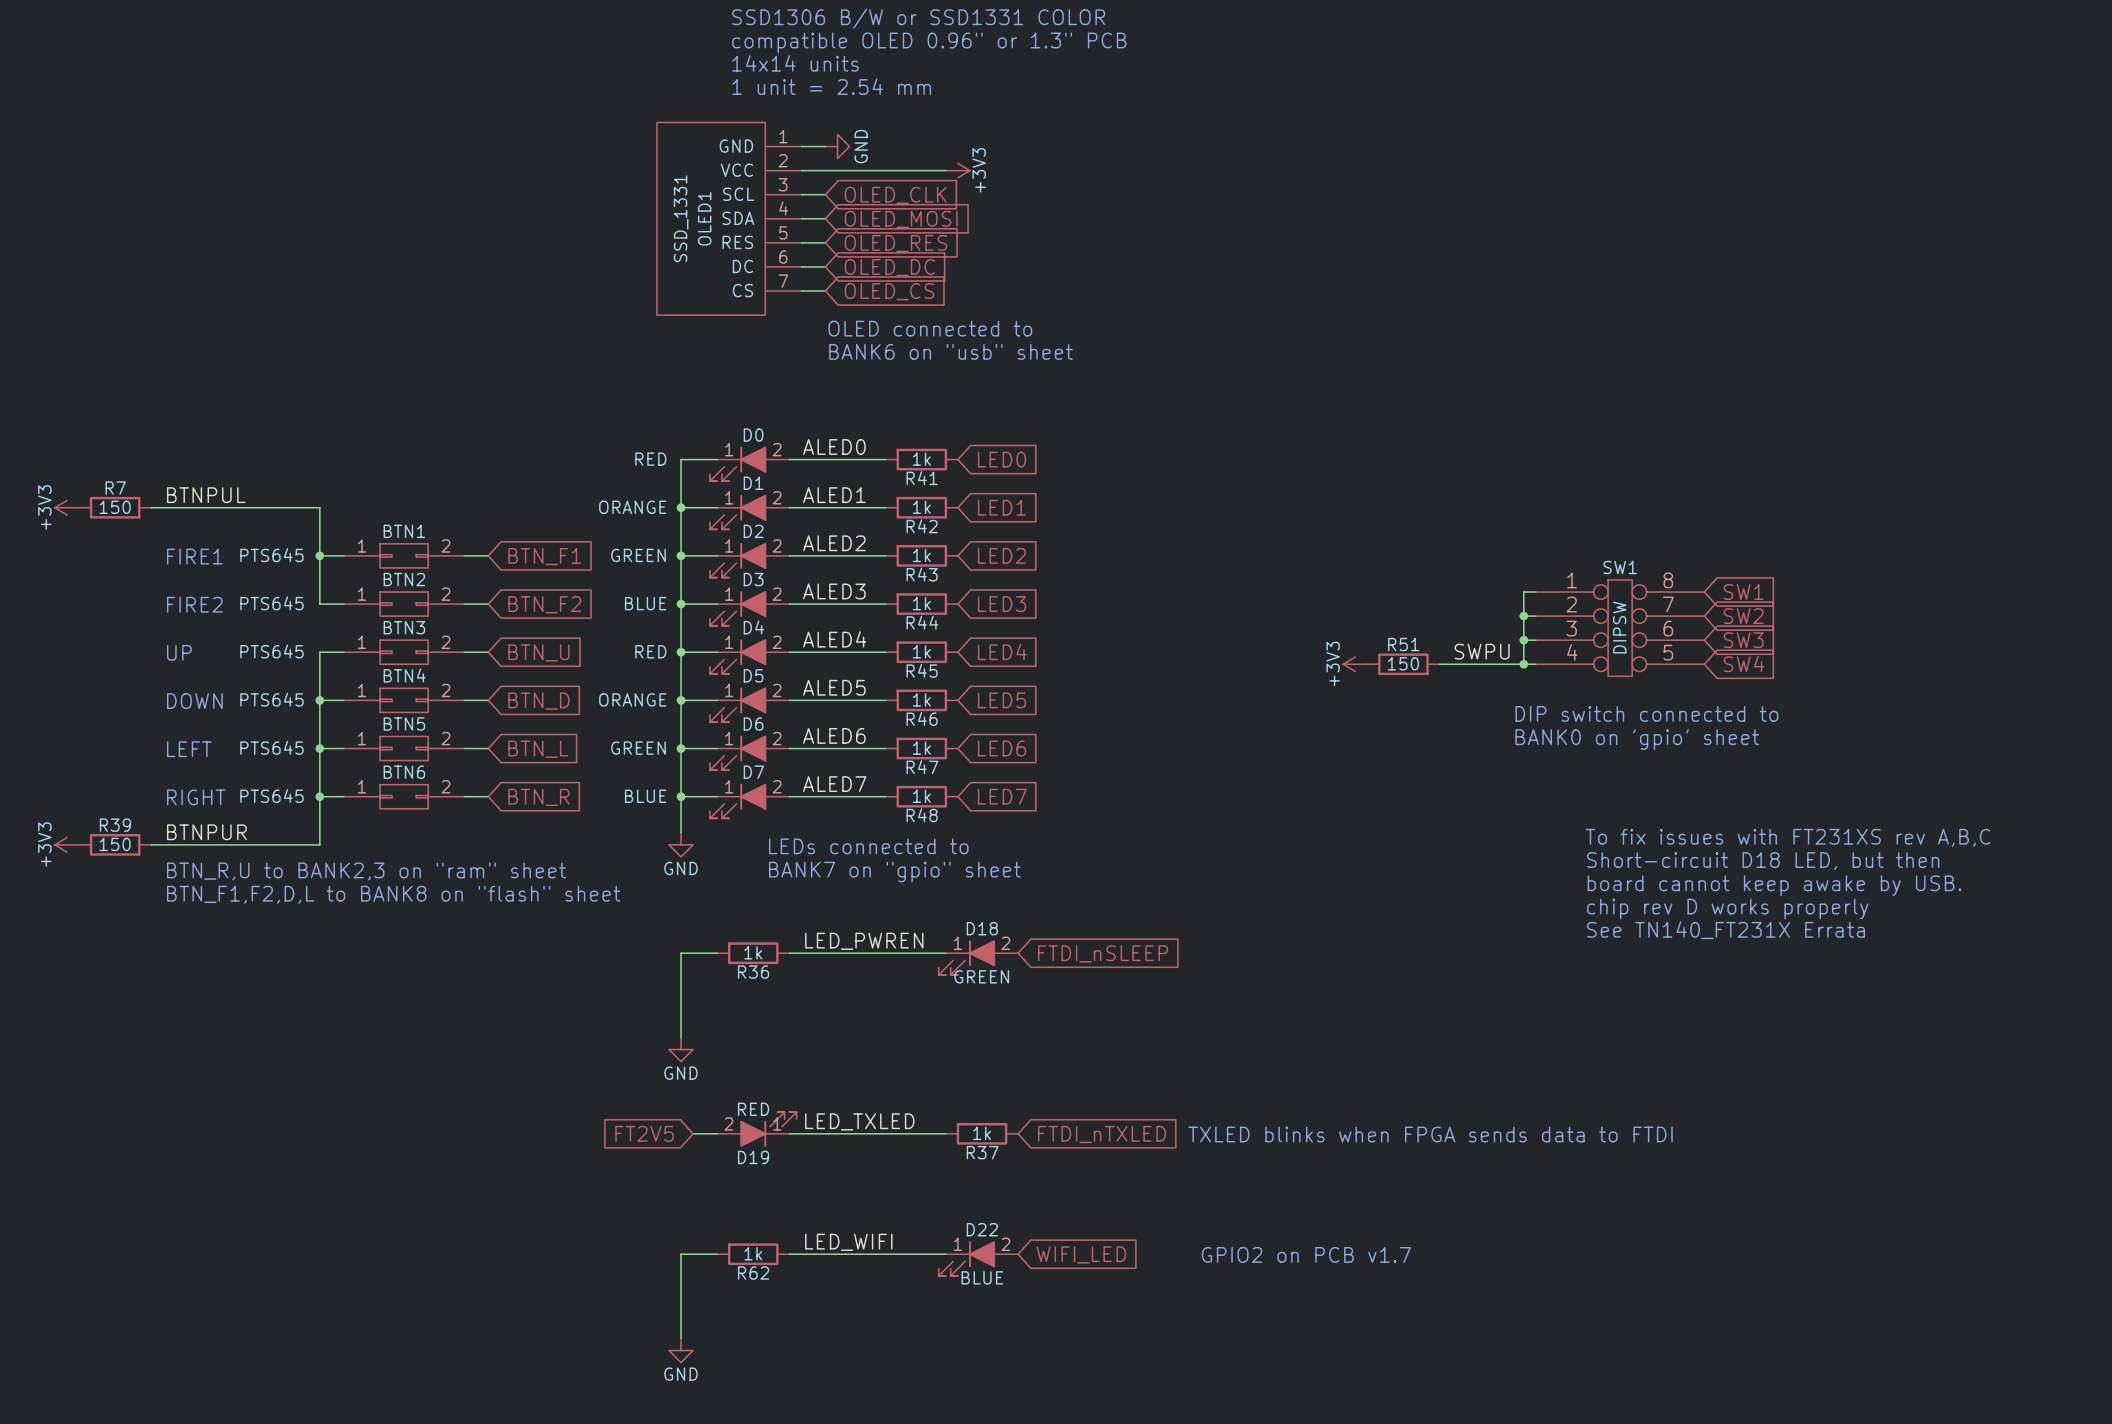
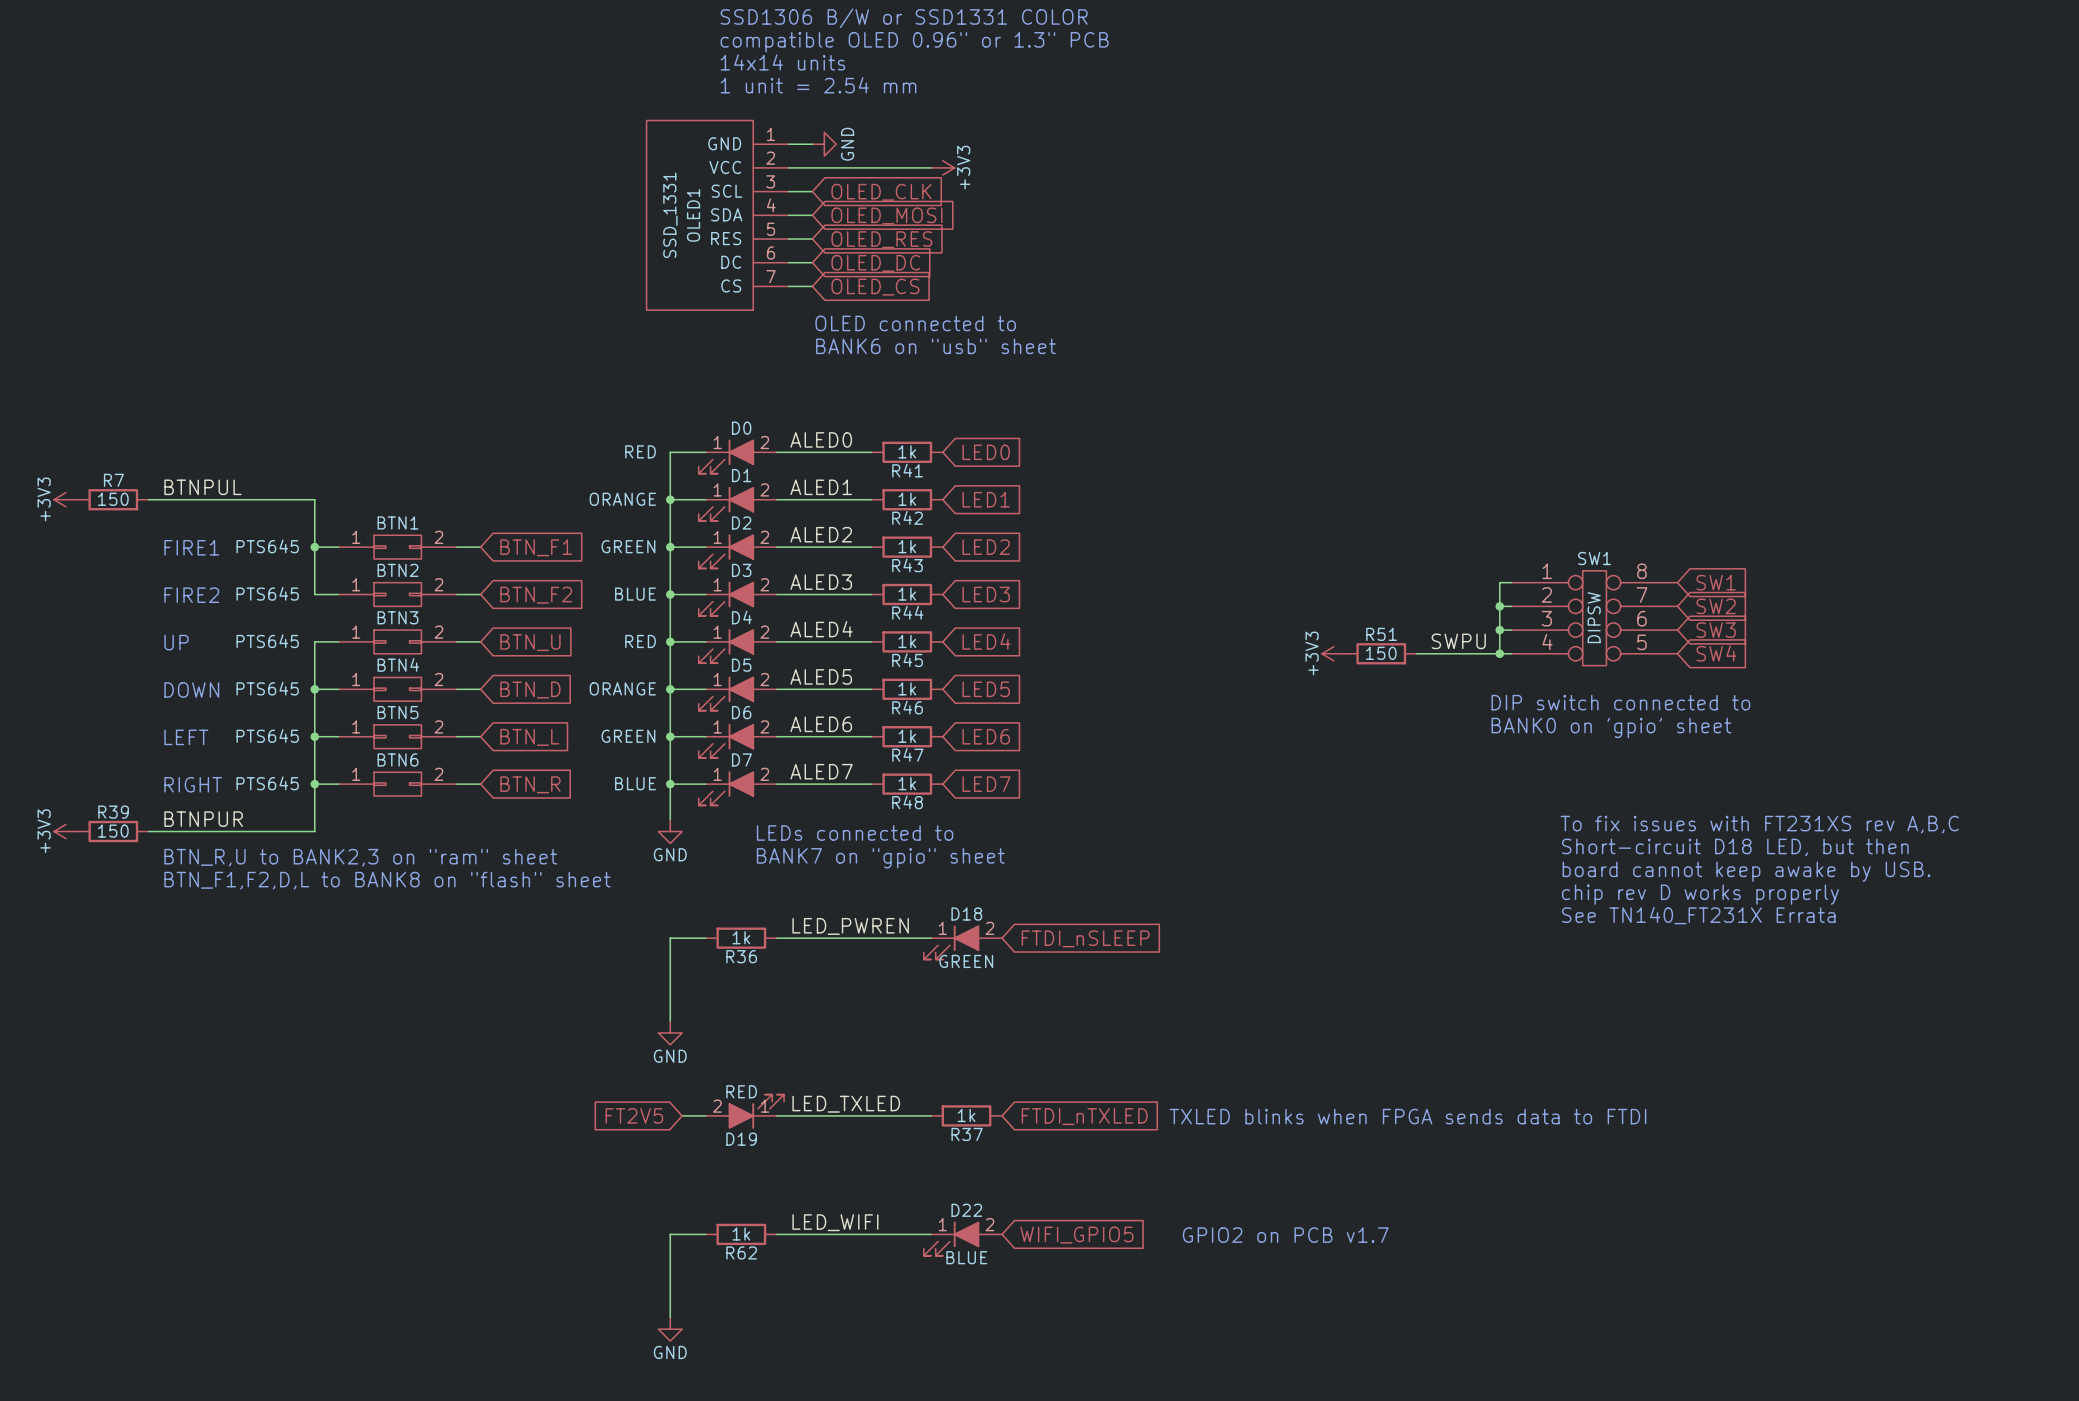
global label: WIFI_LED (1081, 1254) -> WIFI_GPIO5 (1076, 1235)

